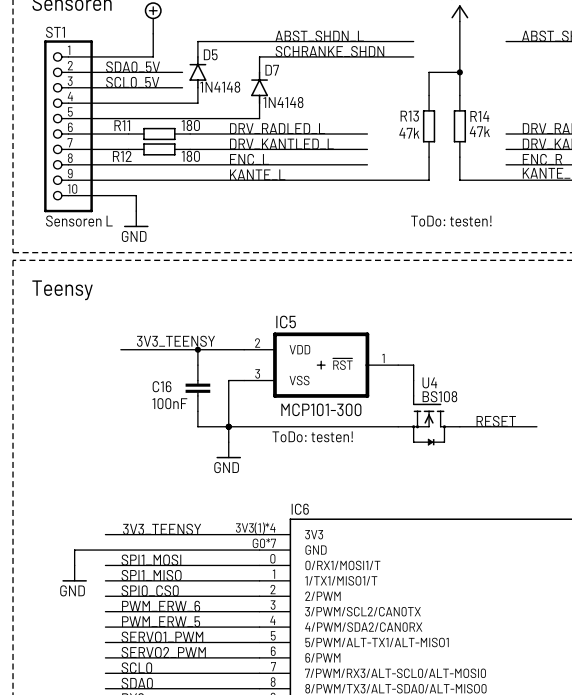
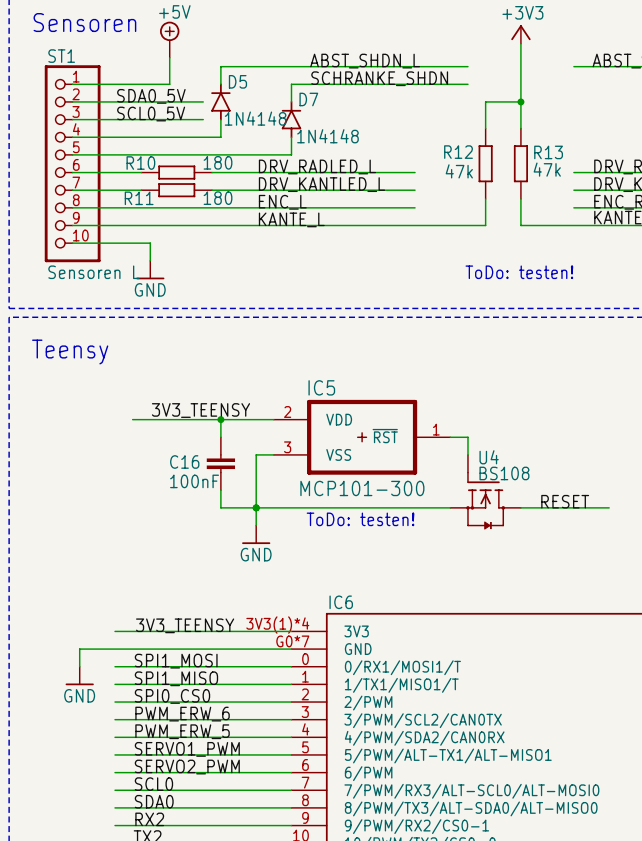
R13 name: R13 (409, 116) -> R12 (458, 152)
R14 name: R14 (479, 116) -> R13 (548, 152)
R11 name: R11 (122, 125) -> R10 (140, 163)
R12 name: R12 (122, 156) -> R11 (139, 198)

